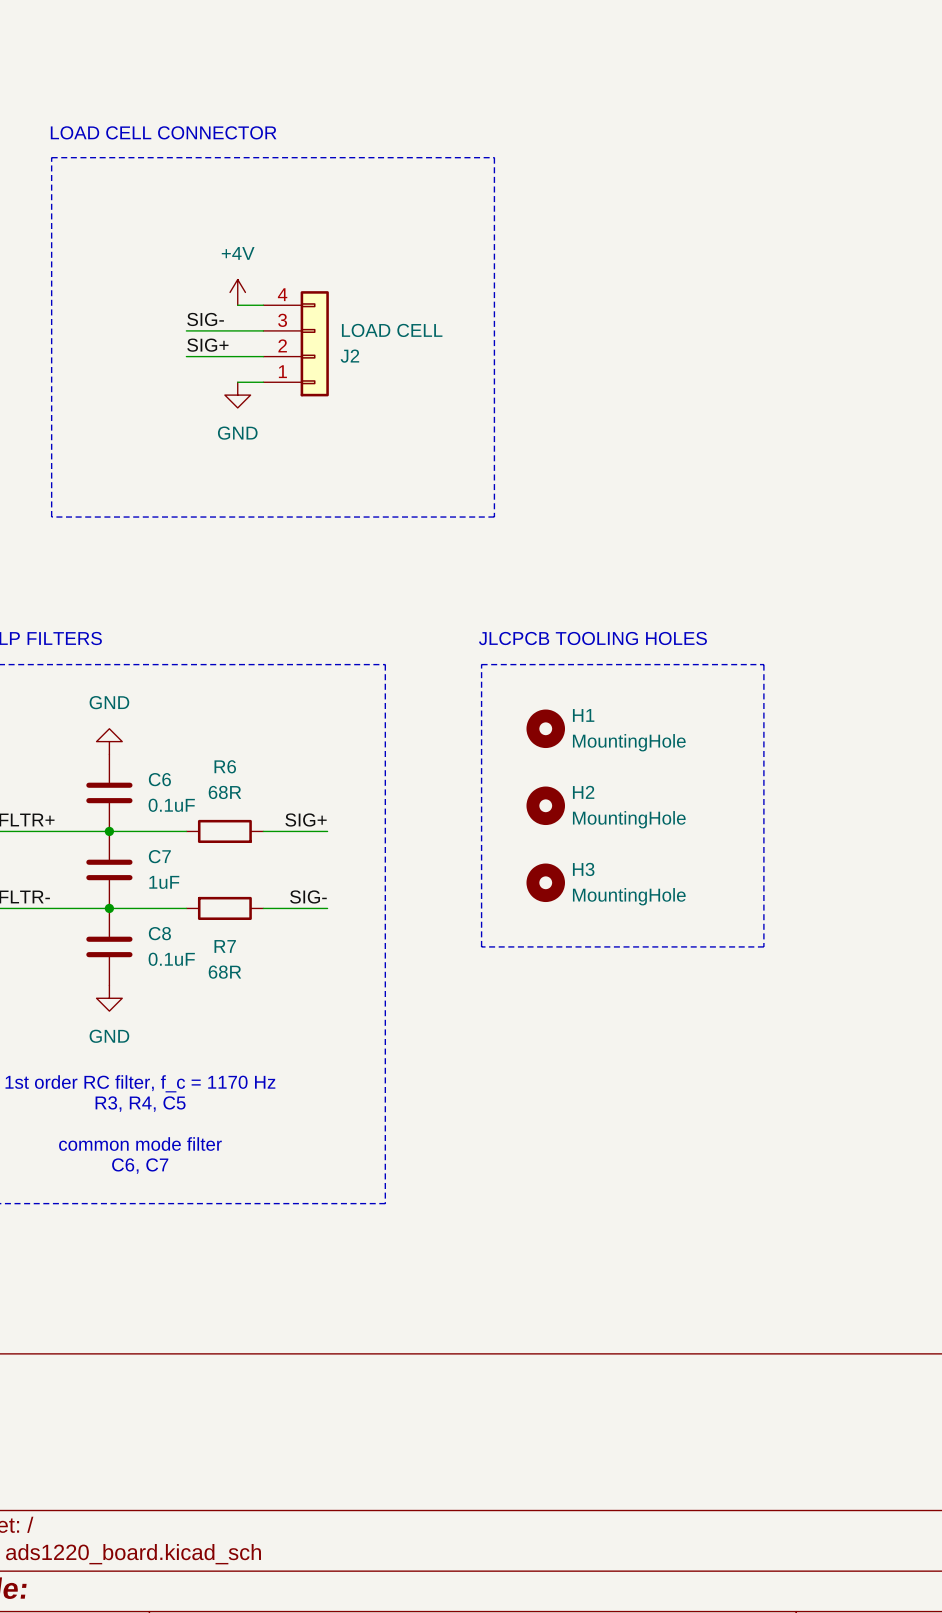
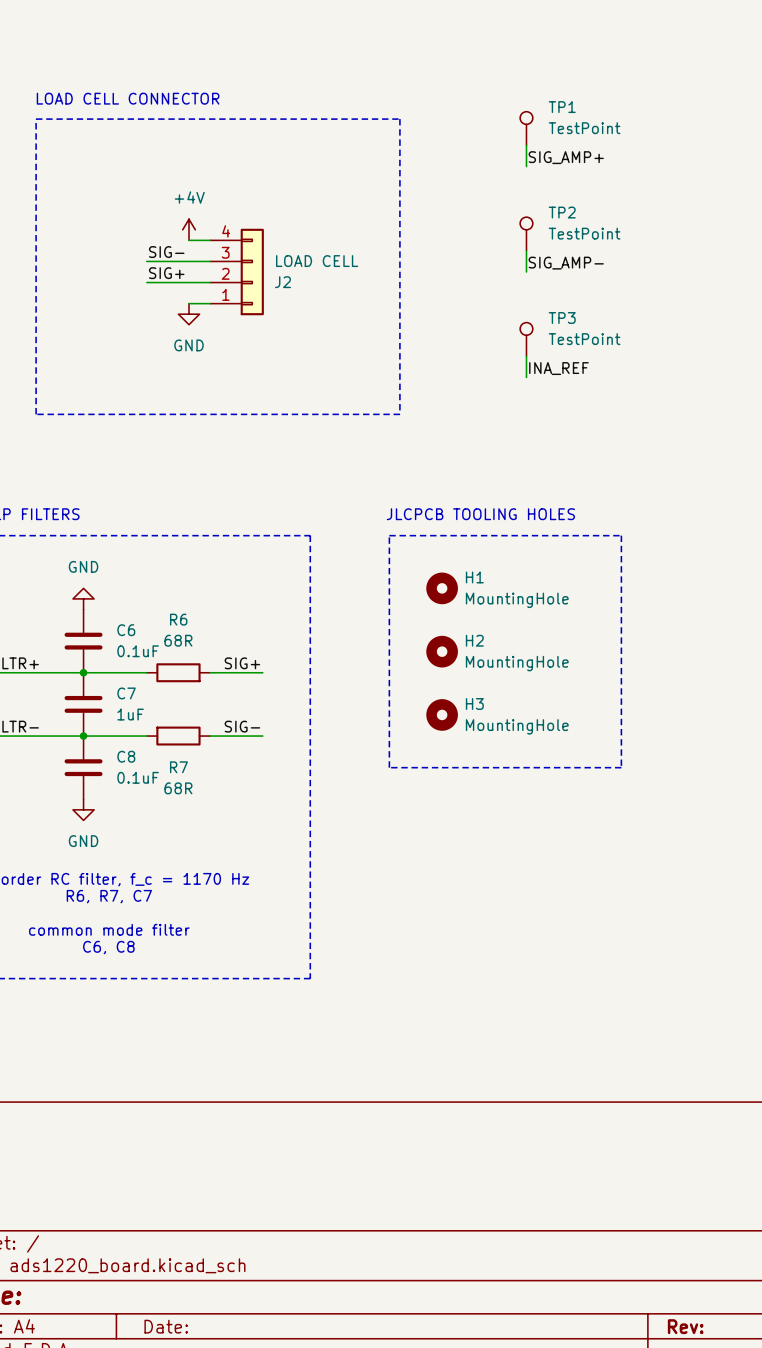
TP1: none -> TestPoint (526, 128)
wire: none -> (526, 145) (526, 166)
label: none -> SIG_AMP+ (566, 157)
TP2: none -> TestPoint (526, 234)
wire: none -> (526, 250) (526, 272)
label: none -> SIG_AMP- (566, 263)
TP3: none -> TestPoint (526, 339)
wire: none -> (526, 356) (526, 377)
label: none -> INA_REF (558, 368)
text: R3, R4, C5 (140, 1104) -> R6, R7, C7 (109, 896)
text: C6, C7 (140, 1166) -> C6, C8 (108, 947)

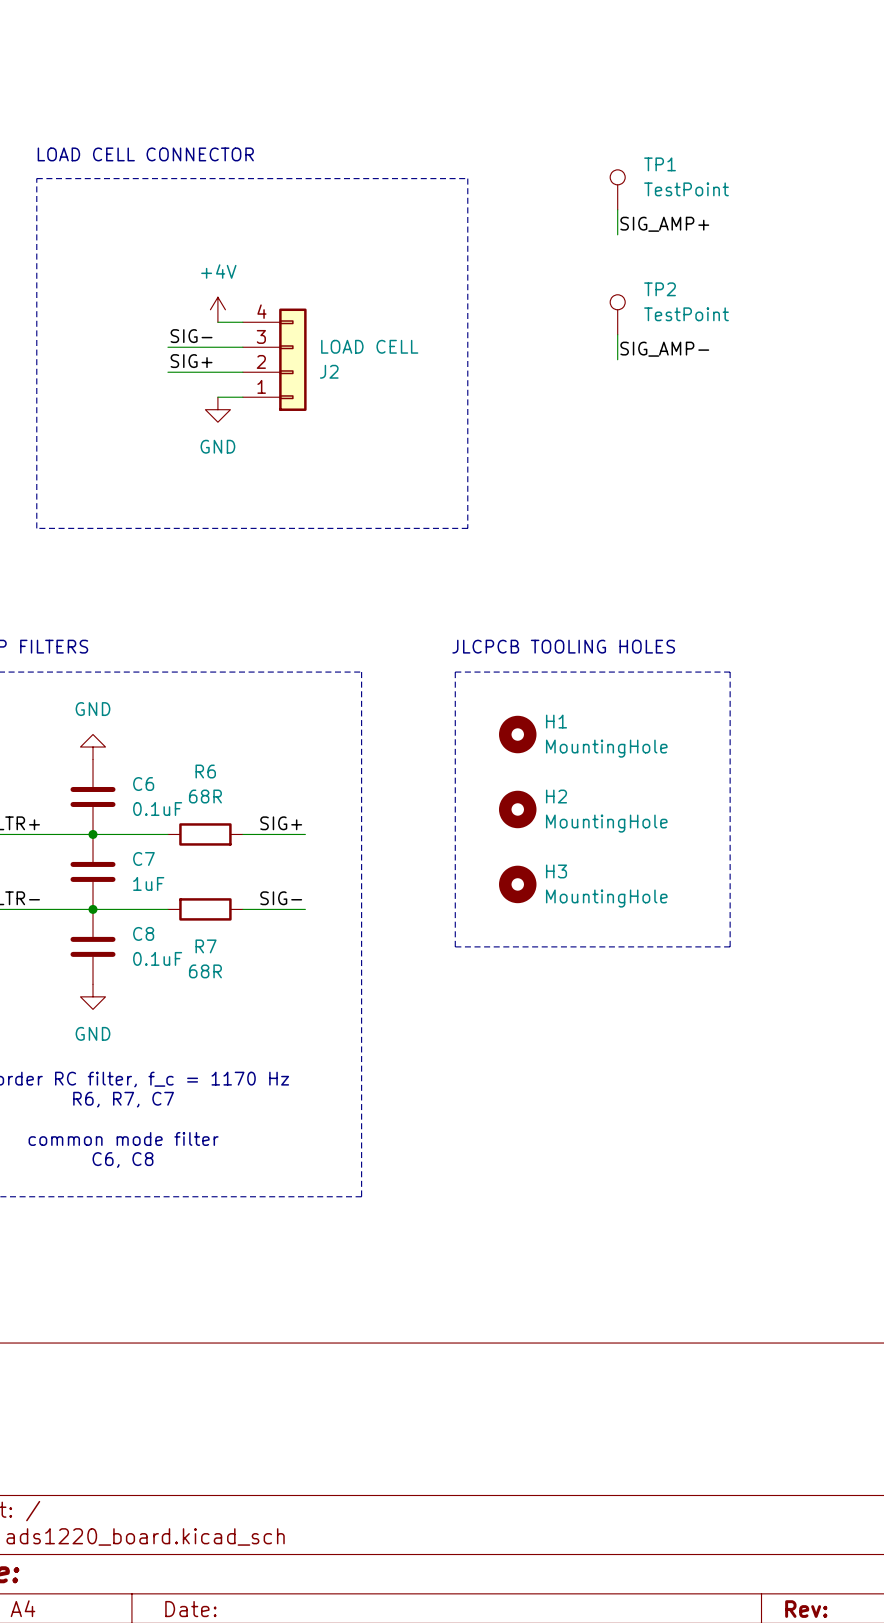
TP3: TestPoint (526, 339) -> none
wire: (526, 356) (526, 377) -> none
label: INA_REF (558, 368) -> none

